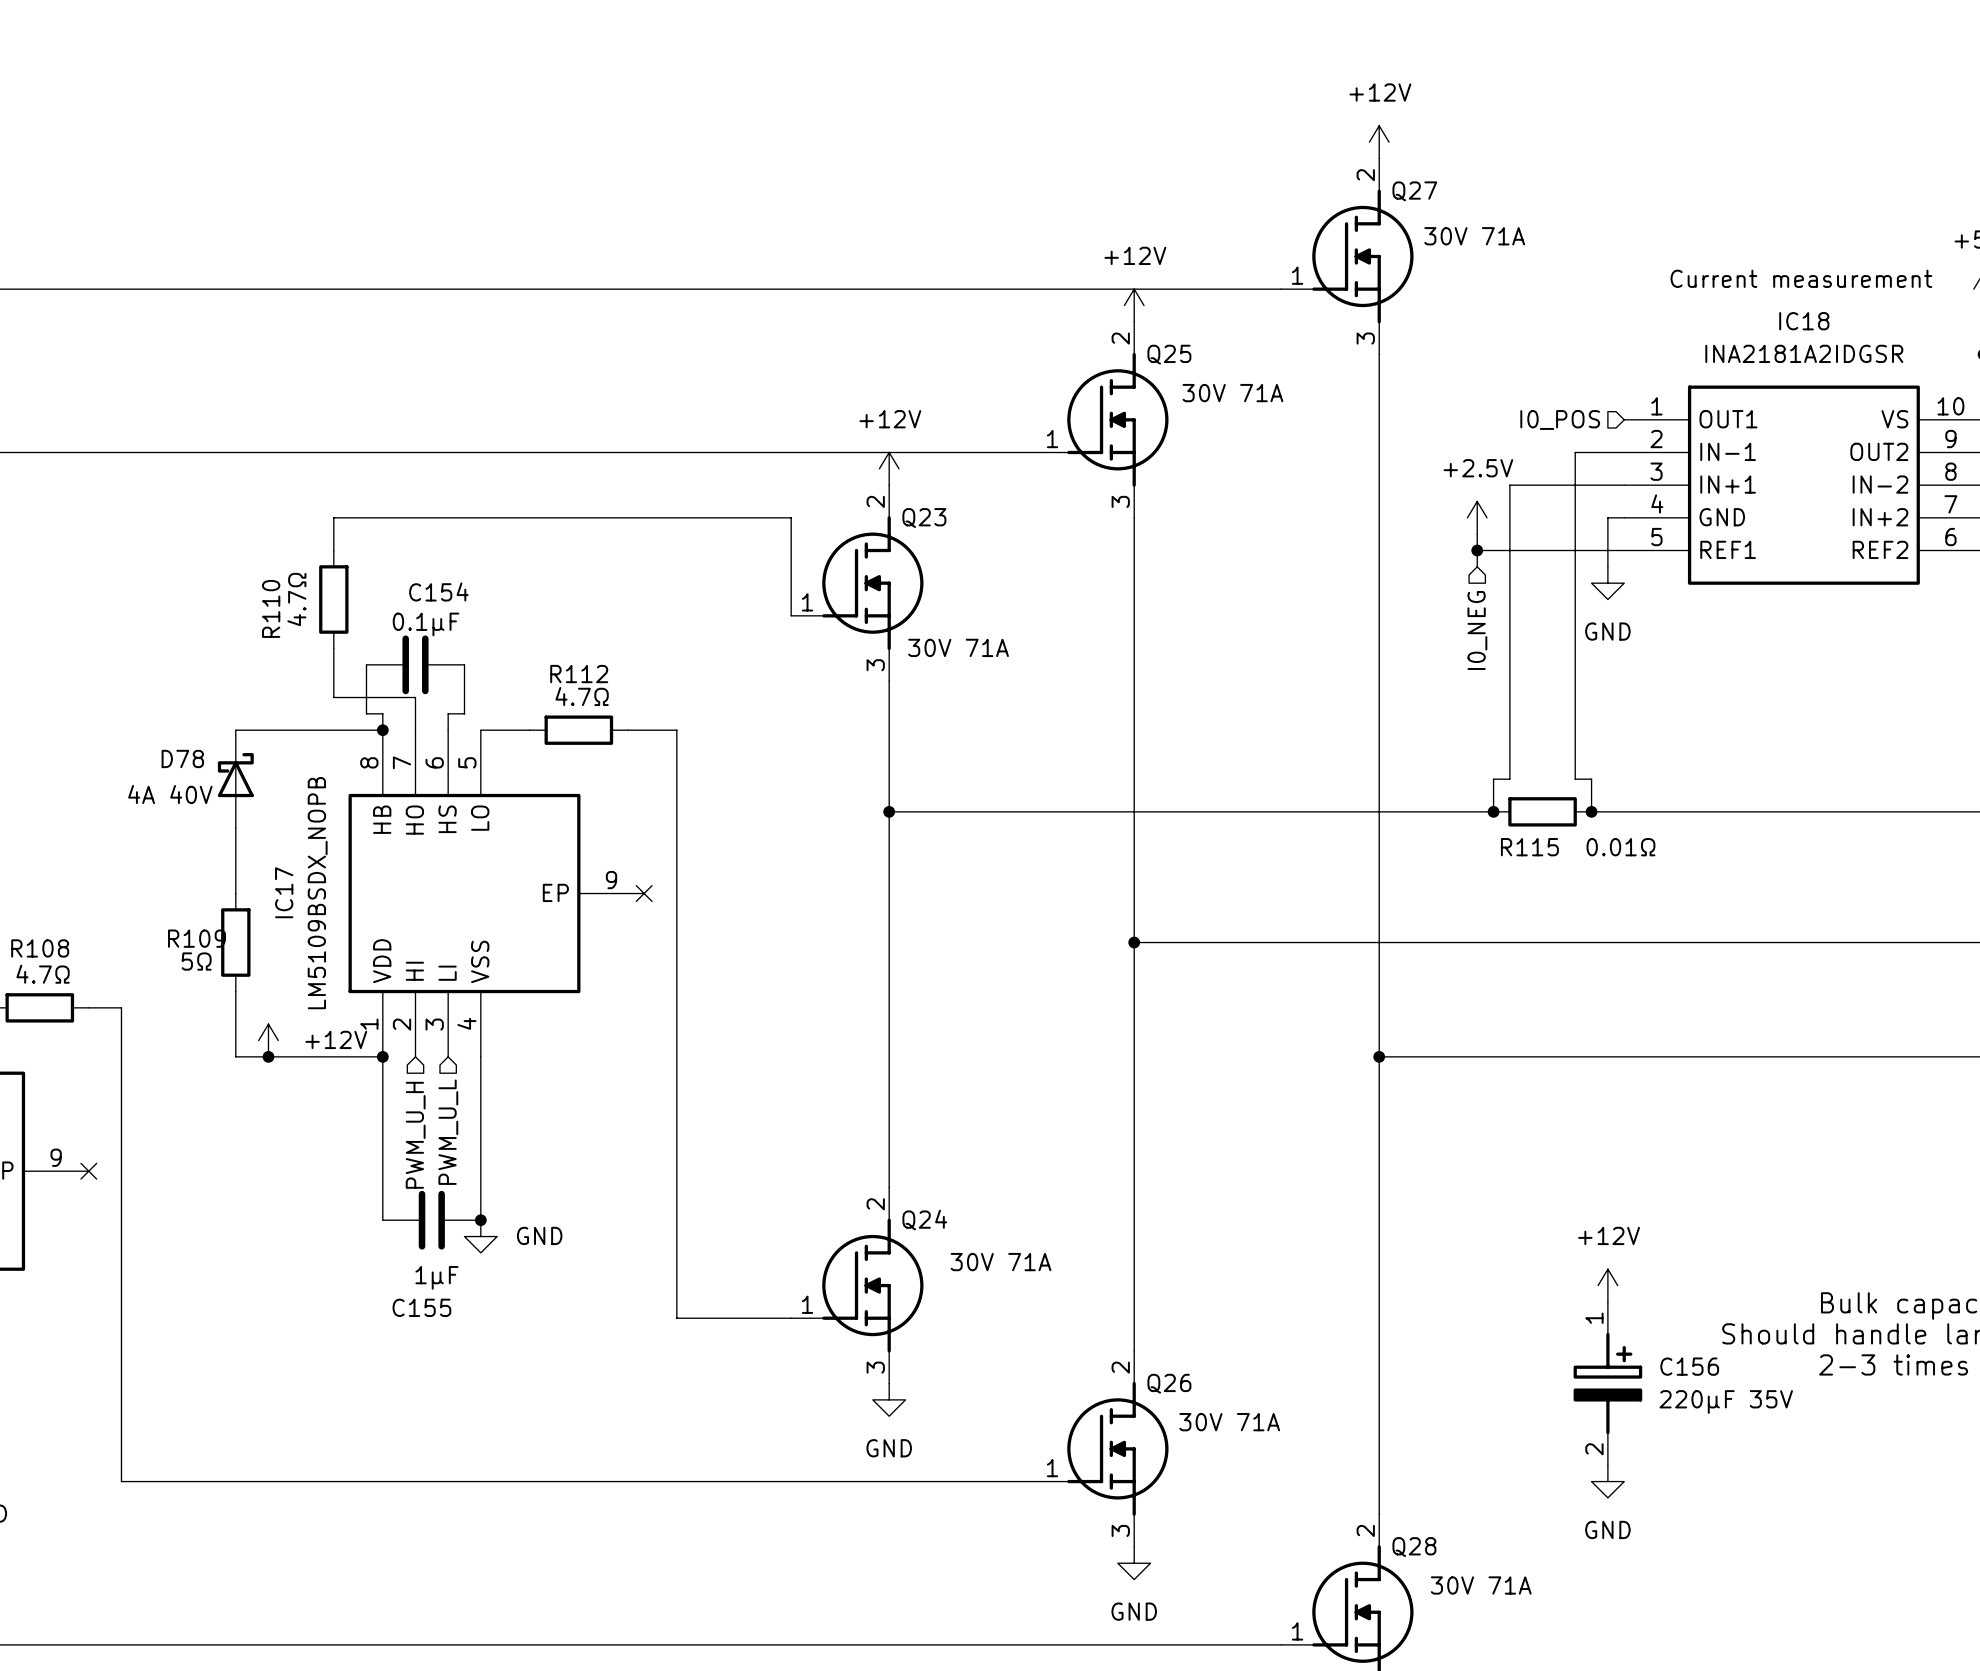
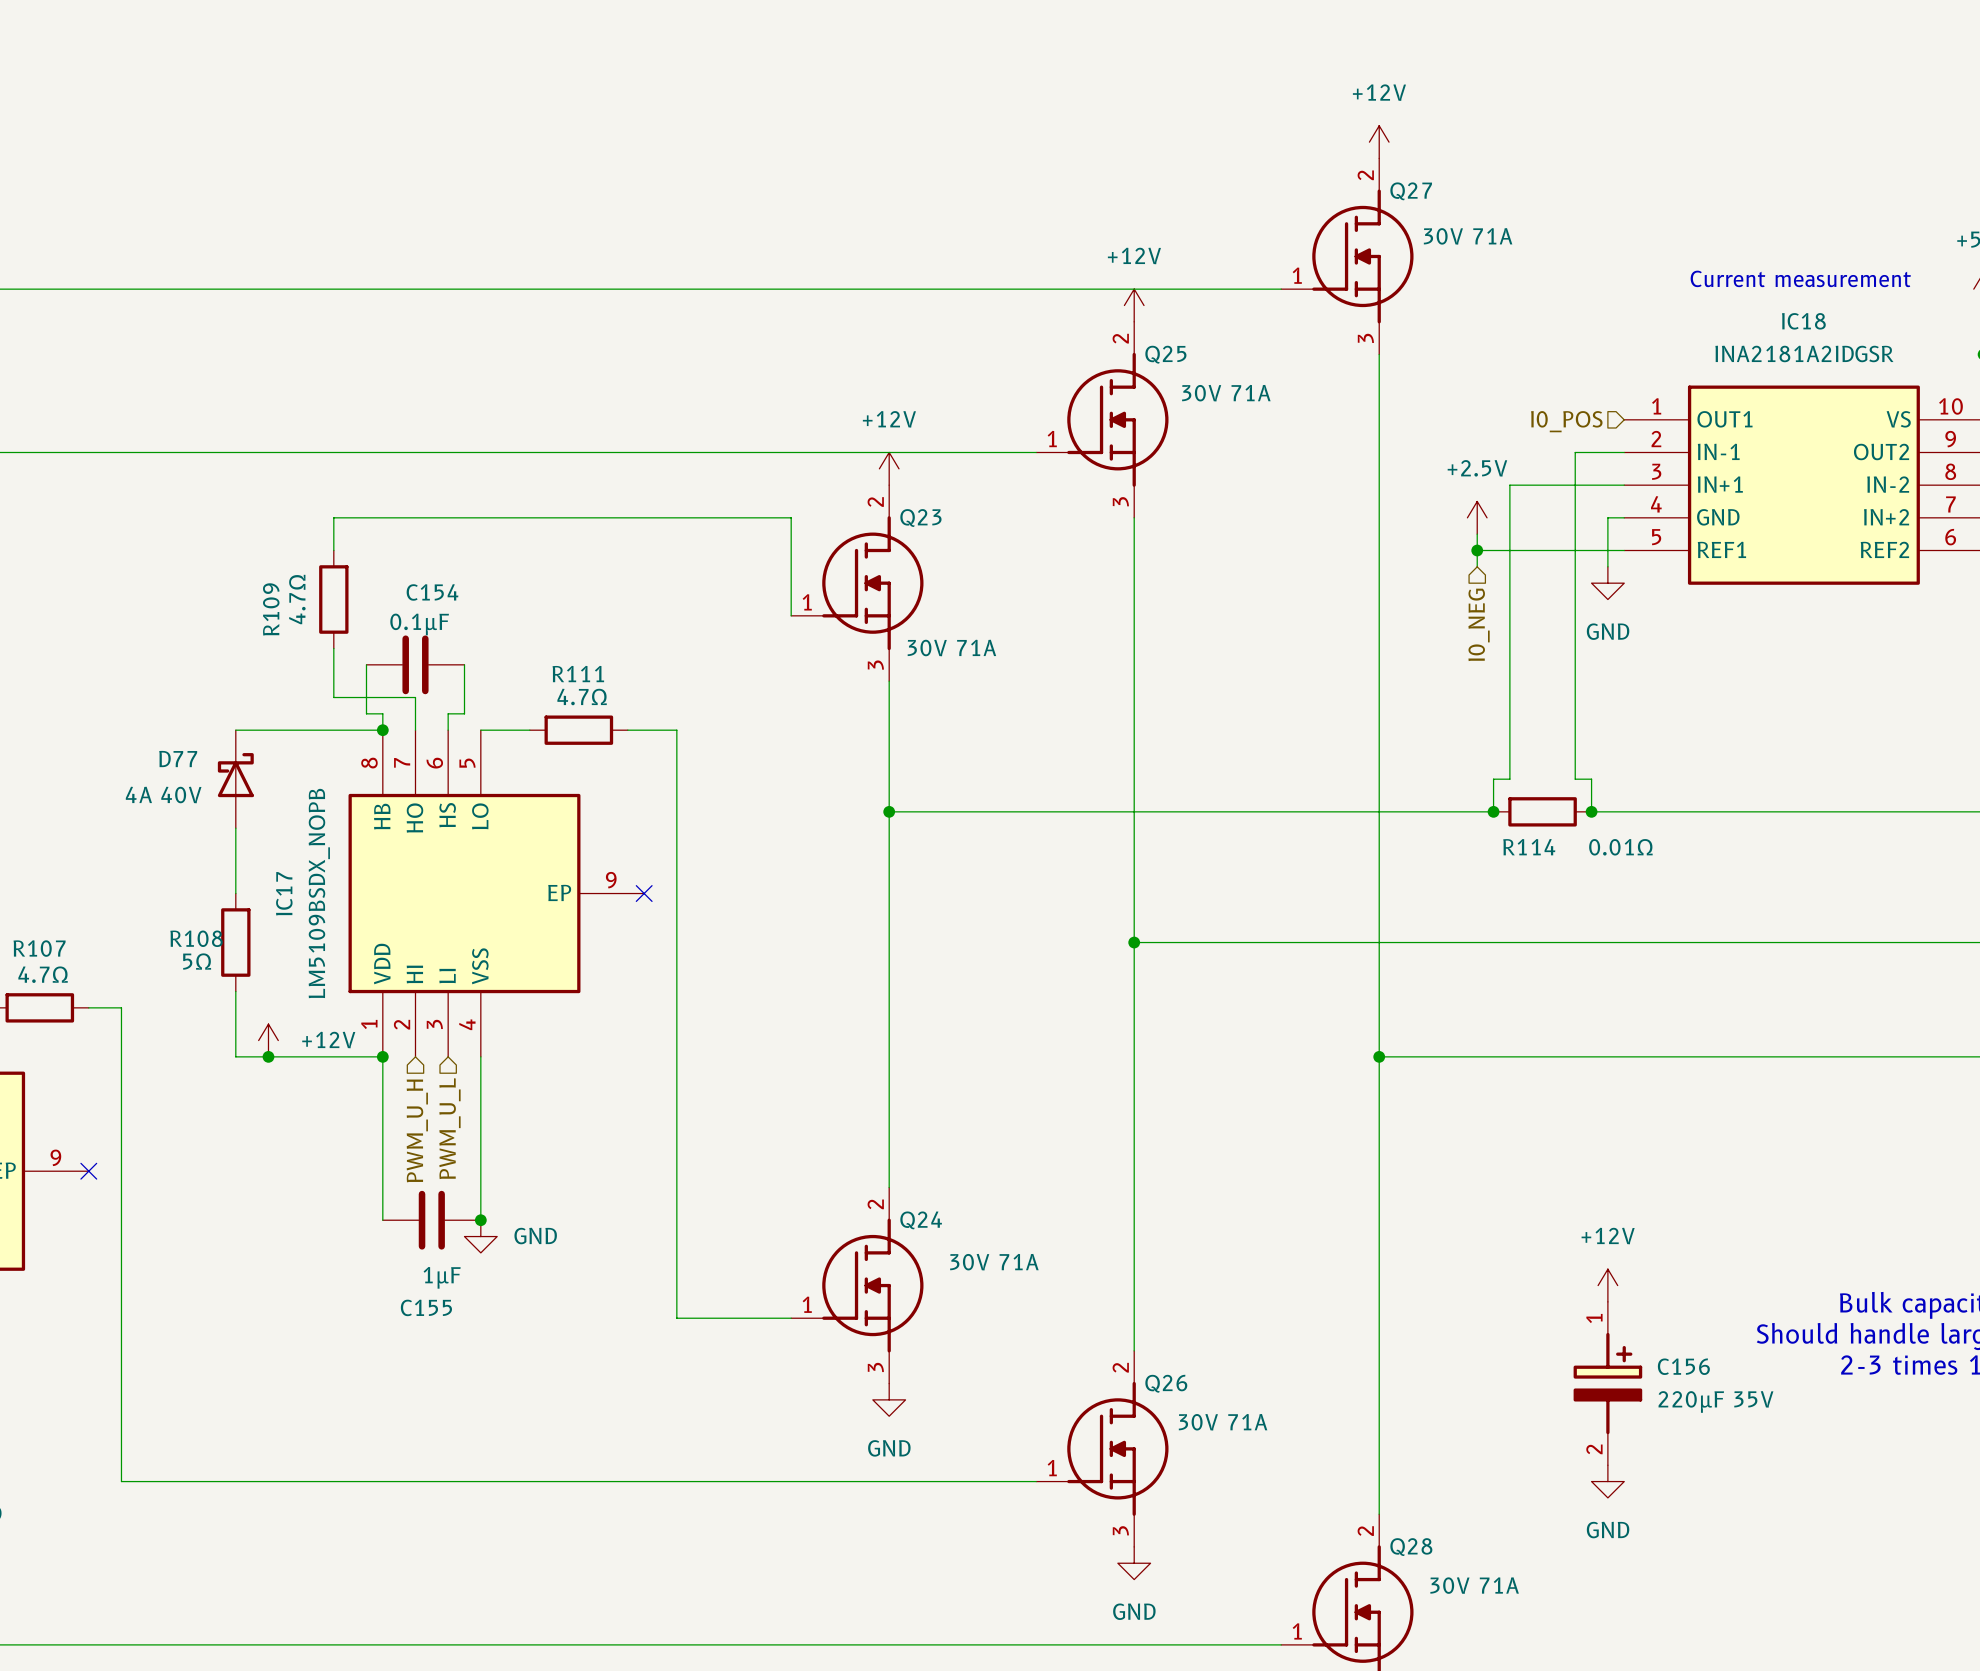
R110 name: R110 (271, 608) -> R109 (271, 609)
R112 name: R112 (579, 674) -> R111 (578, 674)
D78 name: D78 (182, 758) -> D77 (178, 759)
R115 name: R115 (1529, 847) -> R114 (1529, 847)
R109 name: R109 (197, 938) -> R108 (196, 938)
R108 name: R108 (40, 948) -> R107 (39, 948)

